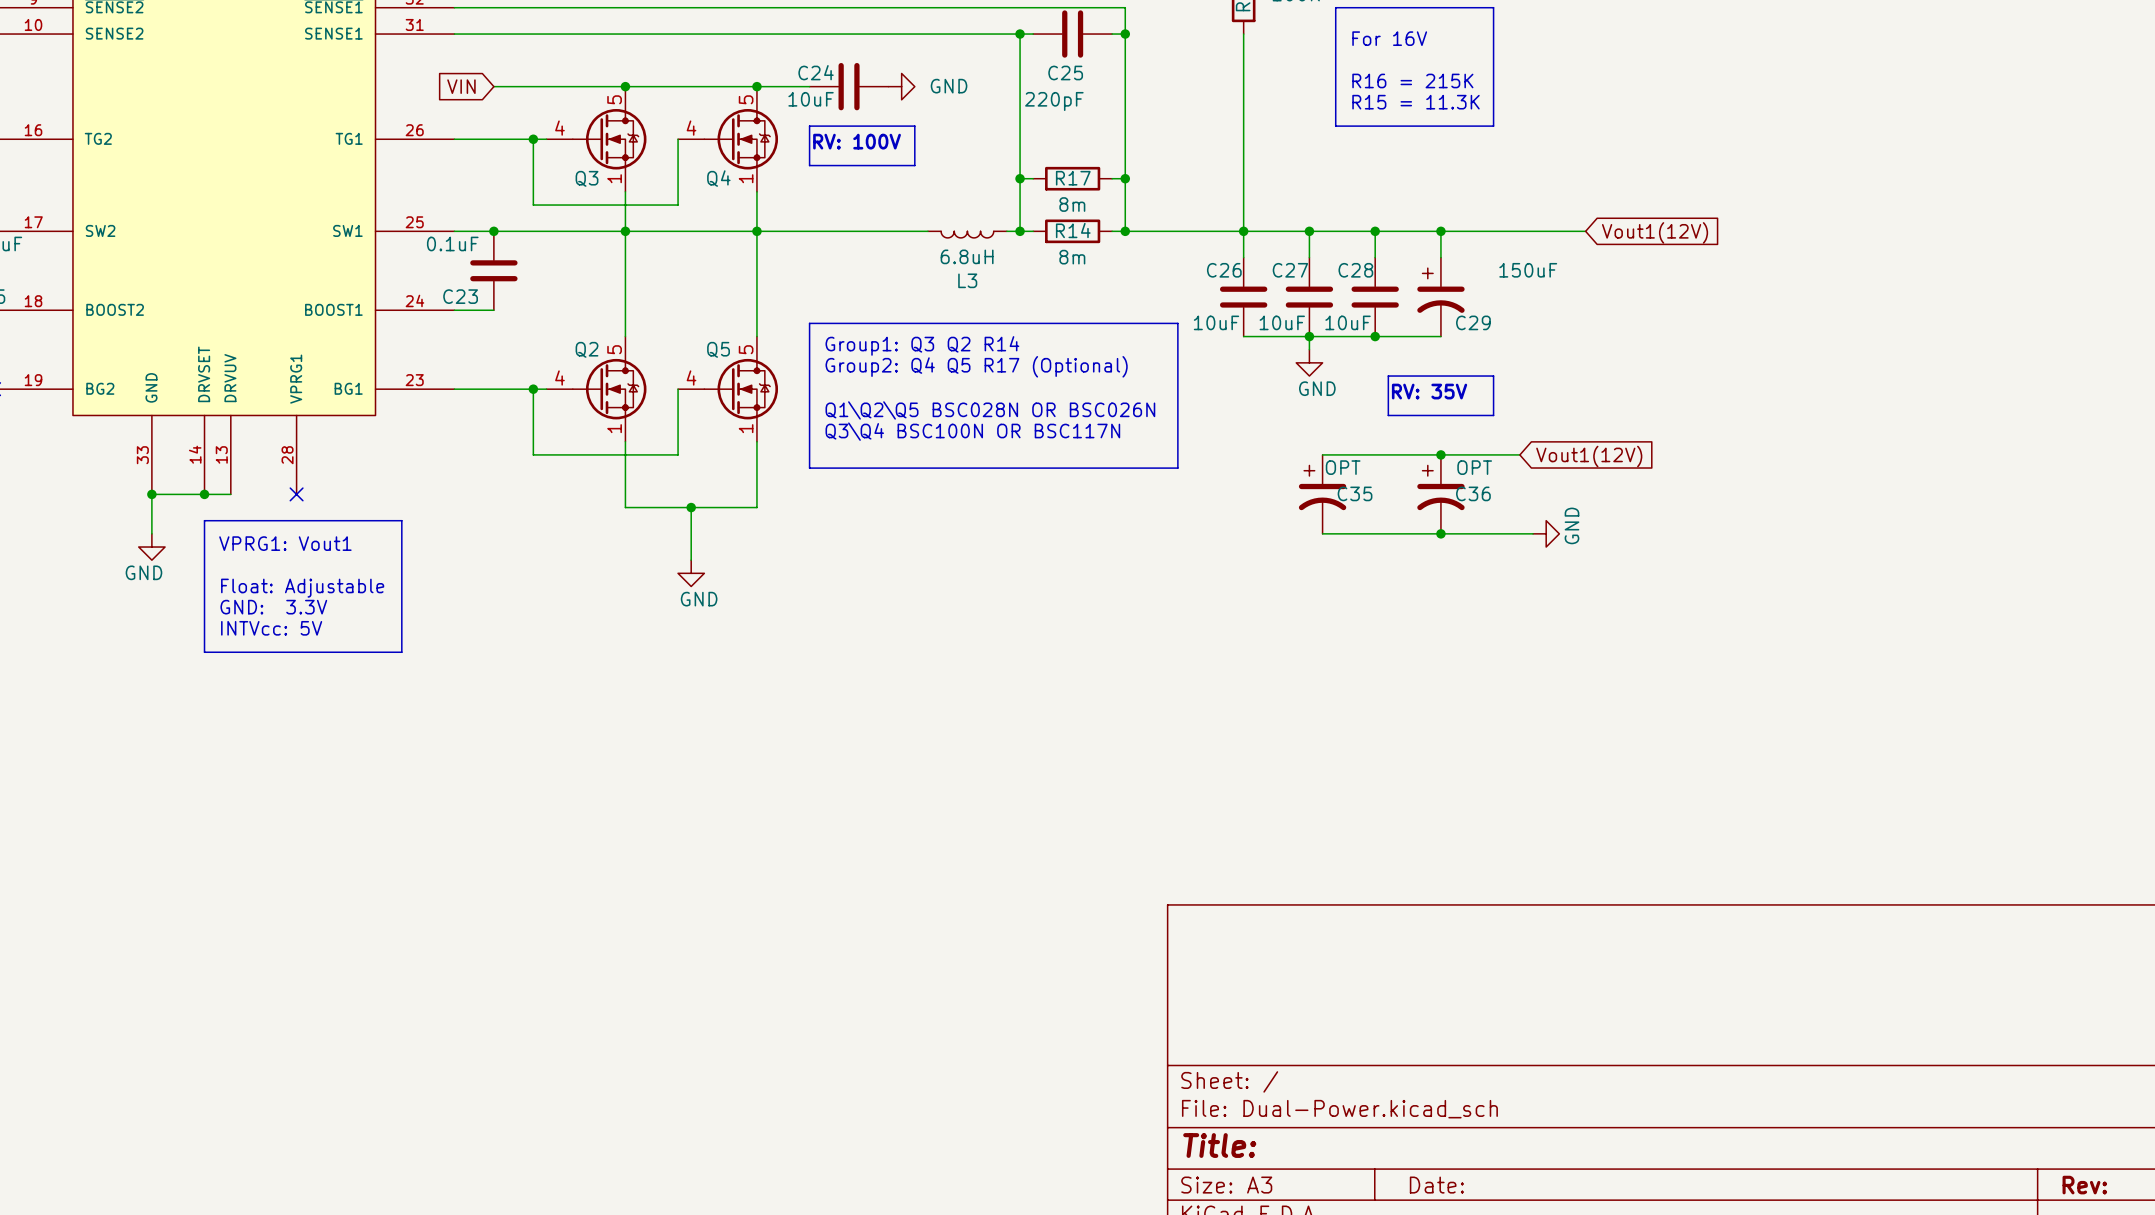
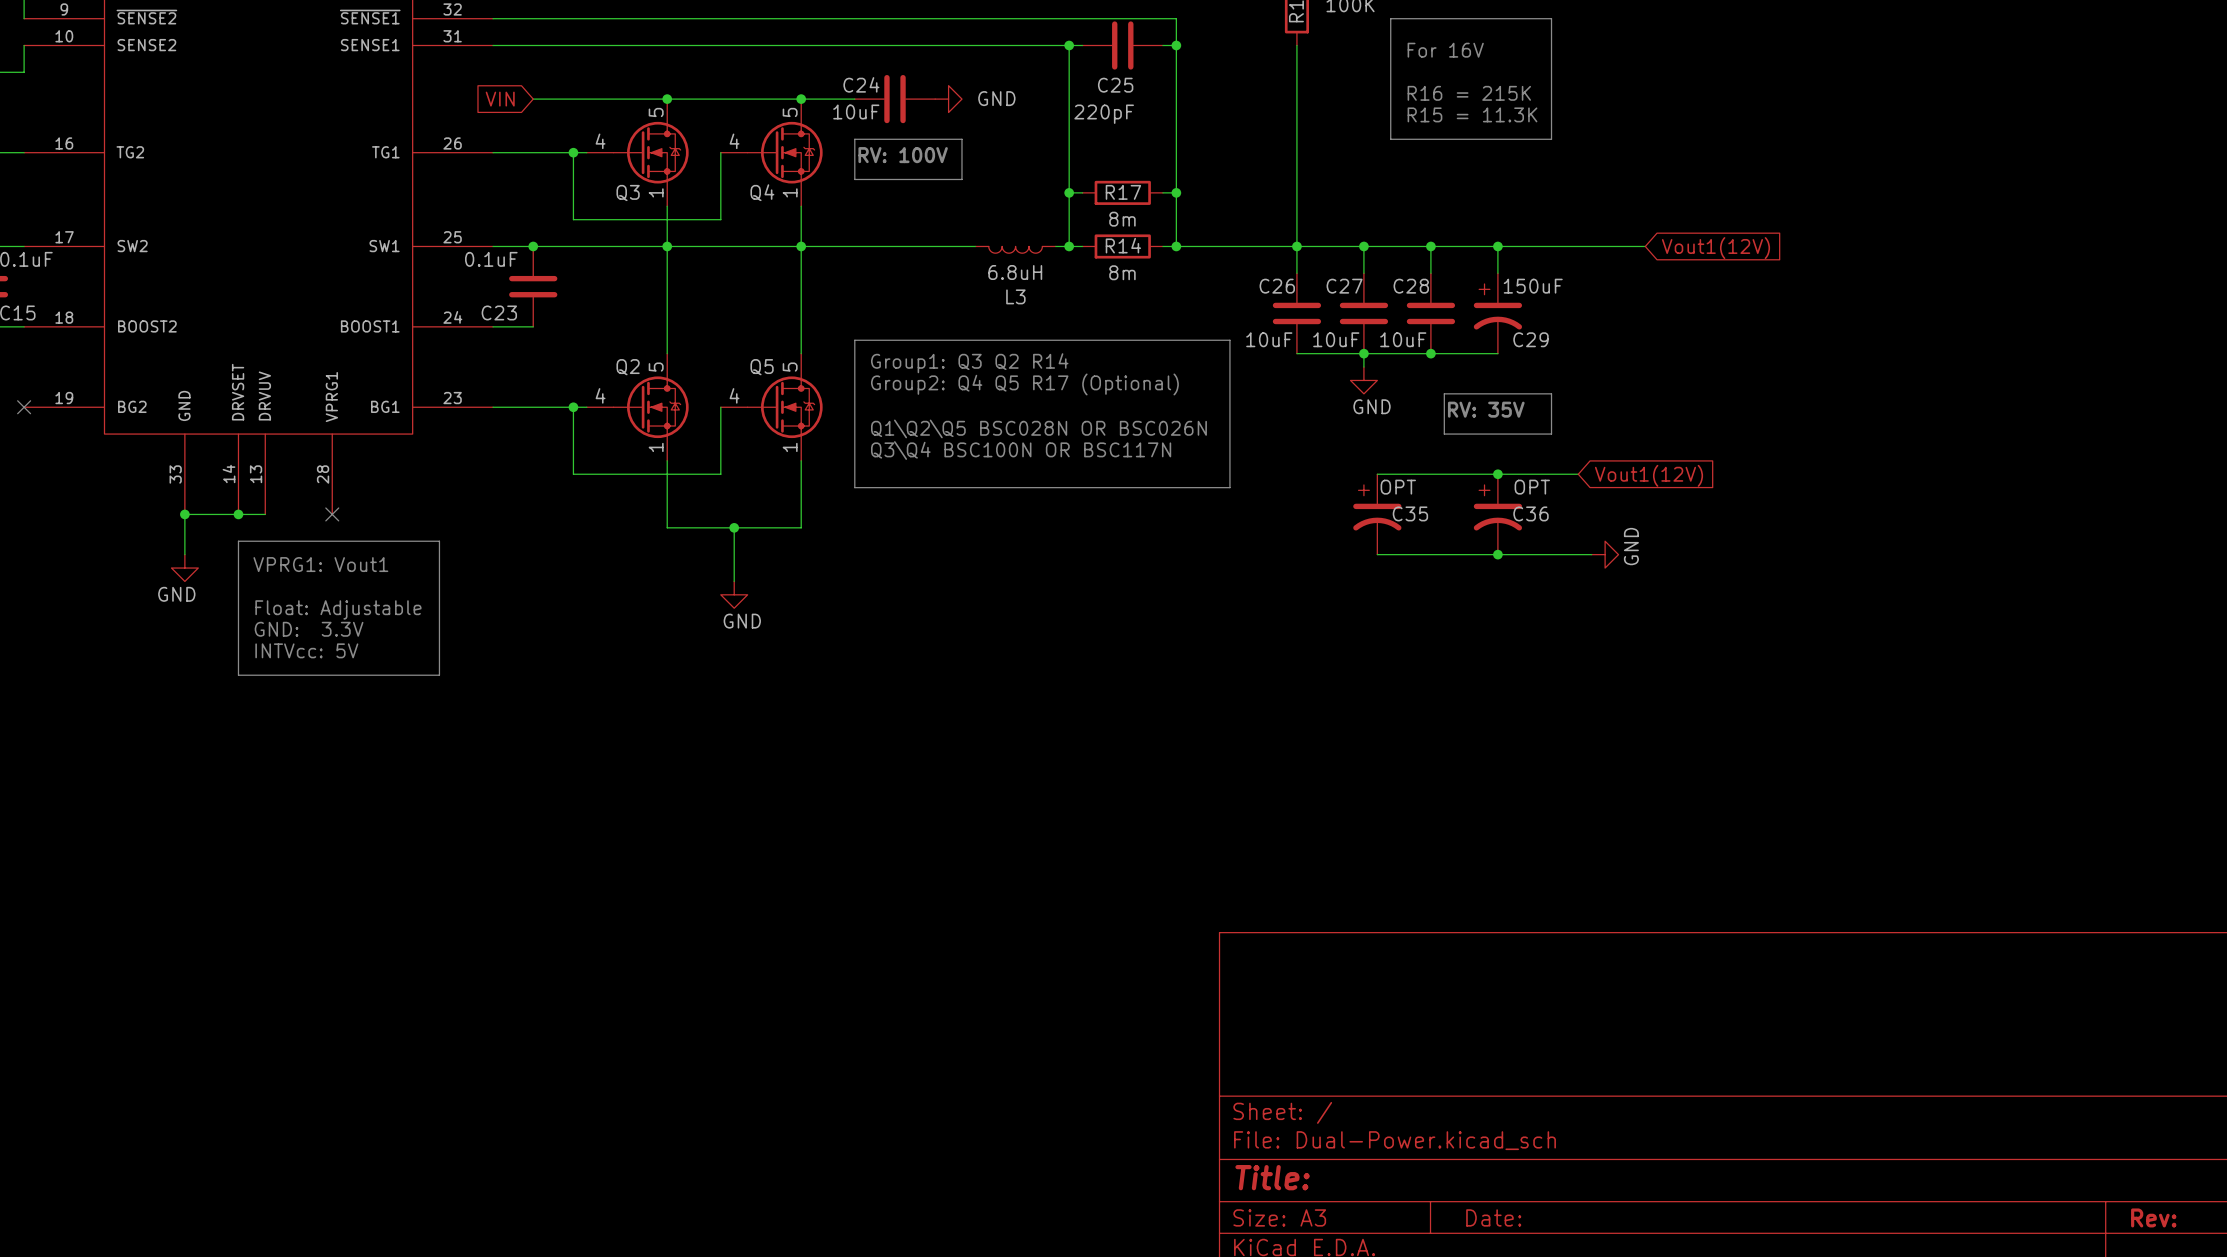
C29 value position: 150uF (1528, 270) -> 150uF (1533, 286)

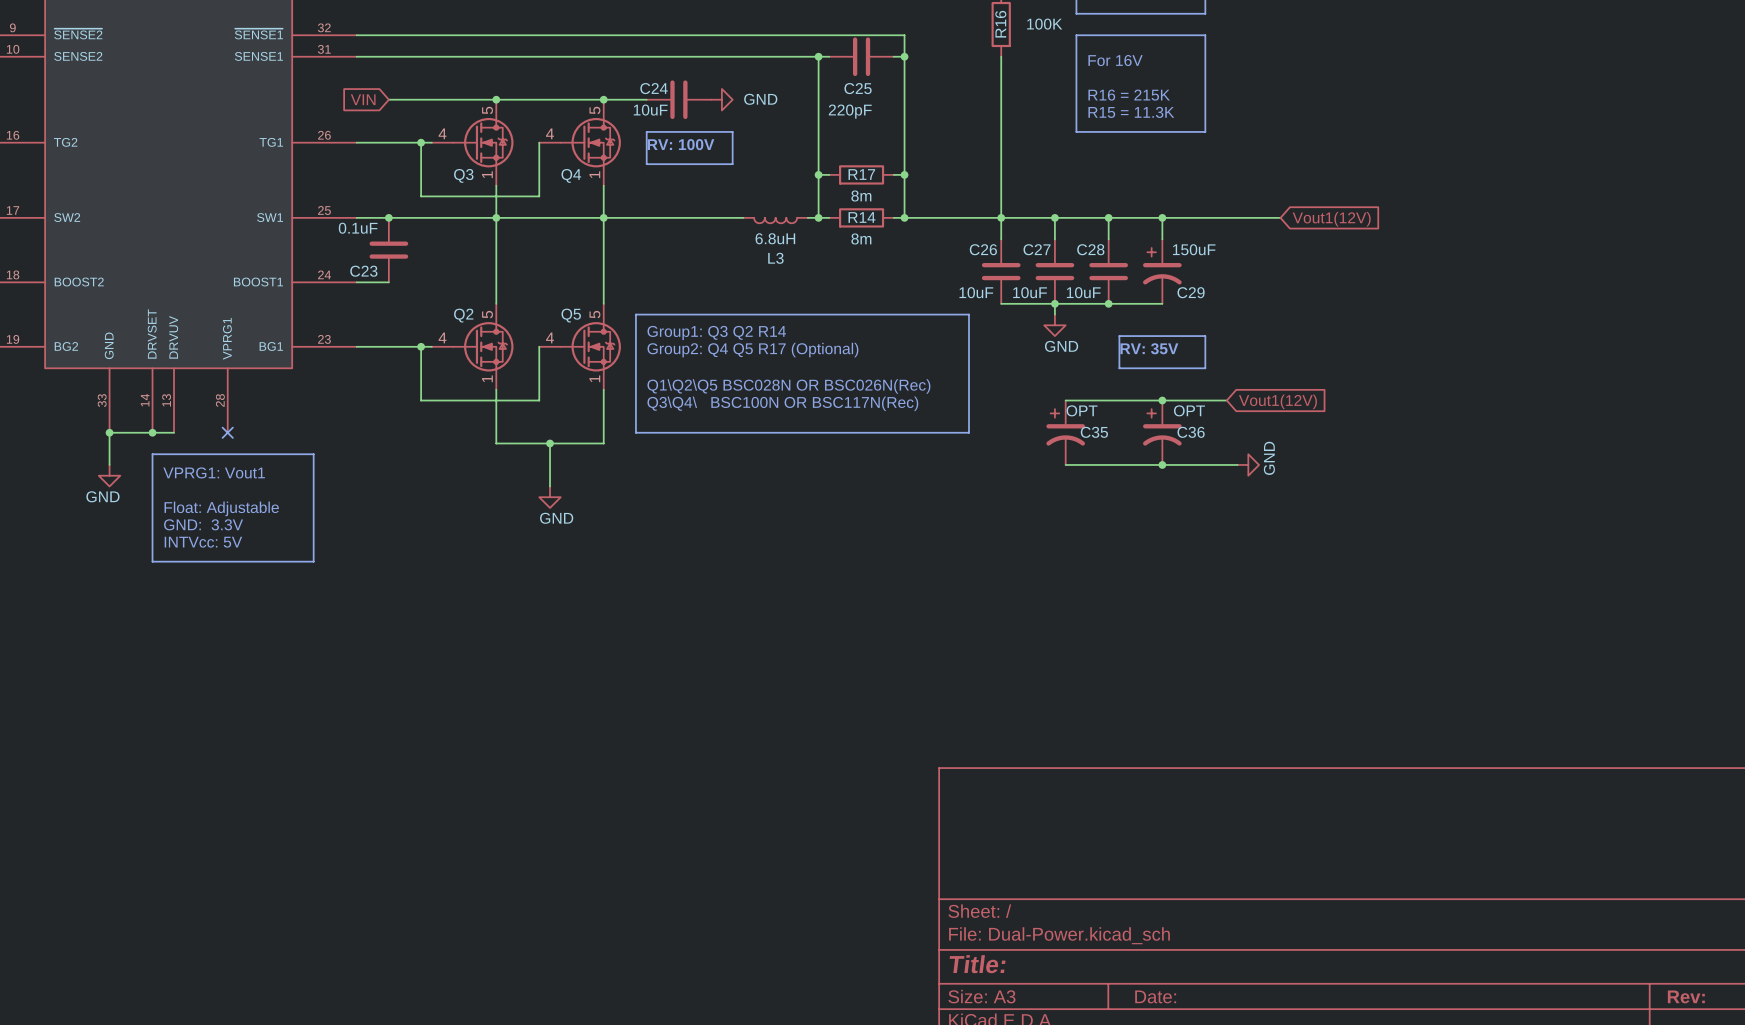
line: (854, 340) (1229, 340) (1229, 487) (854, 487) (854, 340) -> (635, 314) (635, 432) (968, 432) (968, 314) (635, 314)
text position: Group1: Q3 Q2 R14 (969, 363) -> Group1: Q3 Q2 R14 (716, 332)
text position: Group2: Q4 Q5 R17 (Optional) (1024, 384) -> Group2: Q4 Q5 R17 (Optional) (752, 350)
text: Q1\Q2\Q5 BSC028N OR BSC026N (1038, 428) -> none
text: Q3\Q4 BSC100N OR BSC117N (1021, 450) -> Q1\Q2\Q5 BSC028N OR BSC026N(Rec) (788, 386)
text: none -> Q3\Q4\ BSC100N OR BSC117N(Rec) (782, 403)

